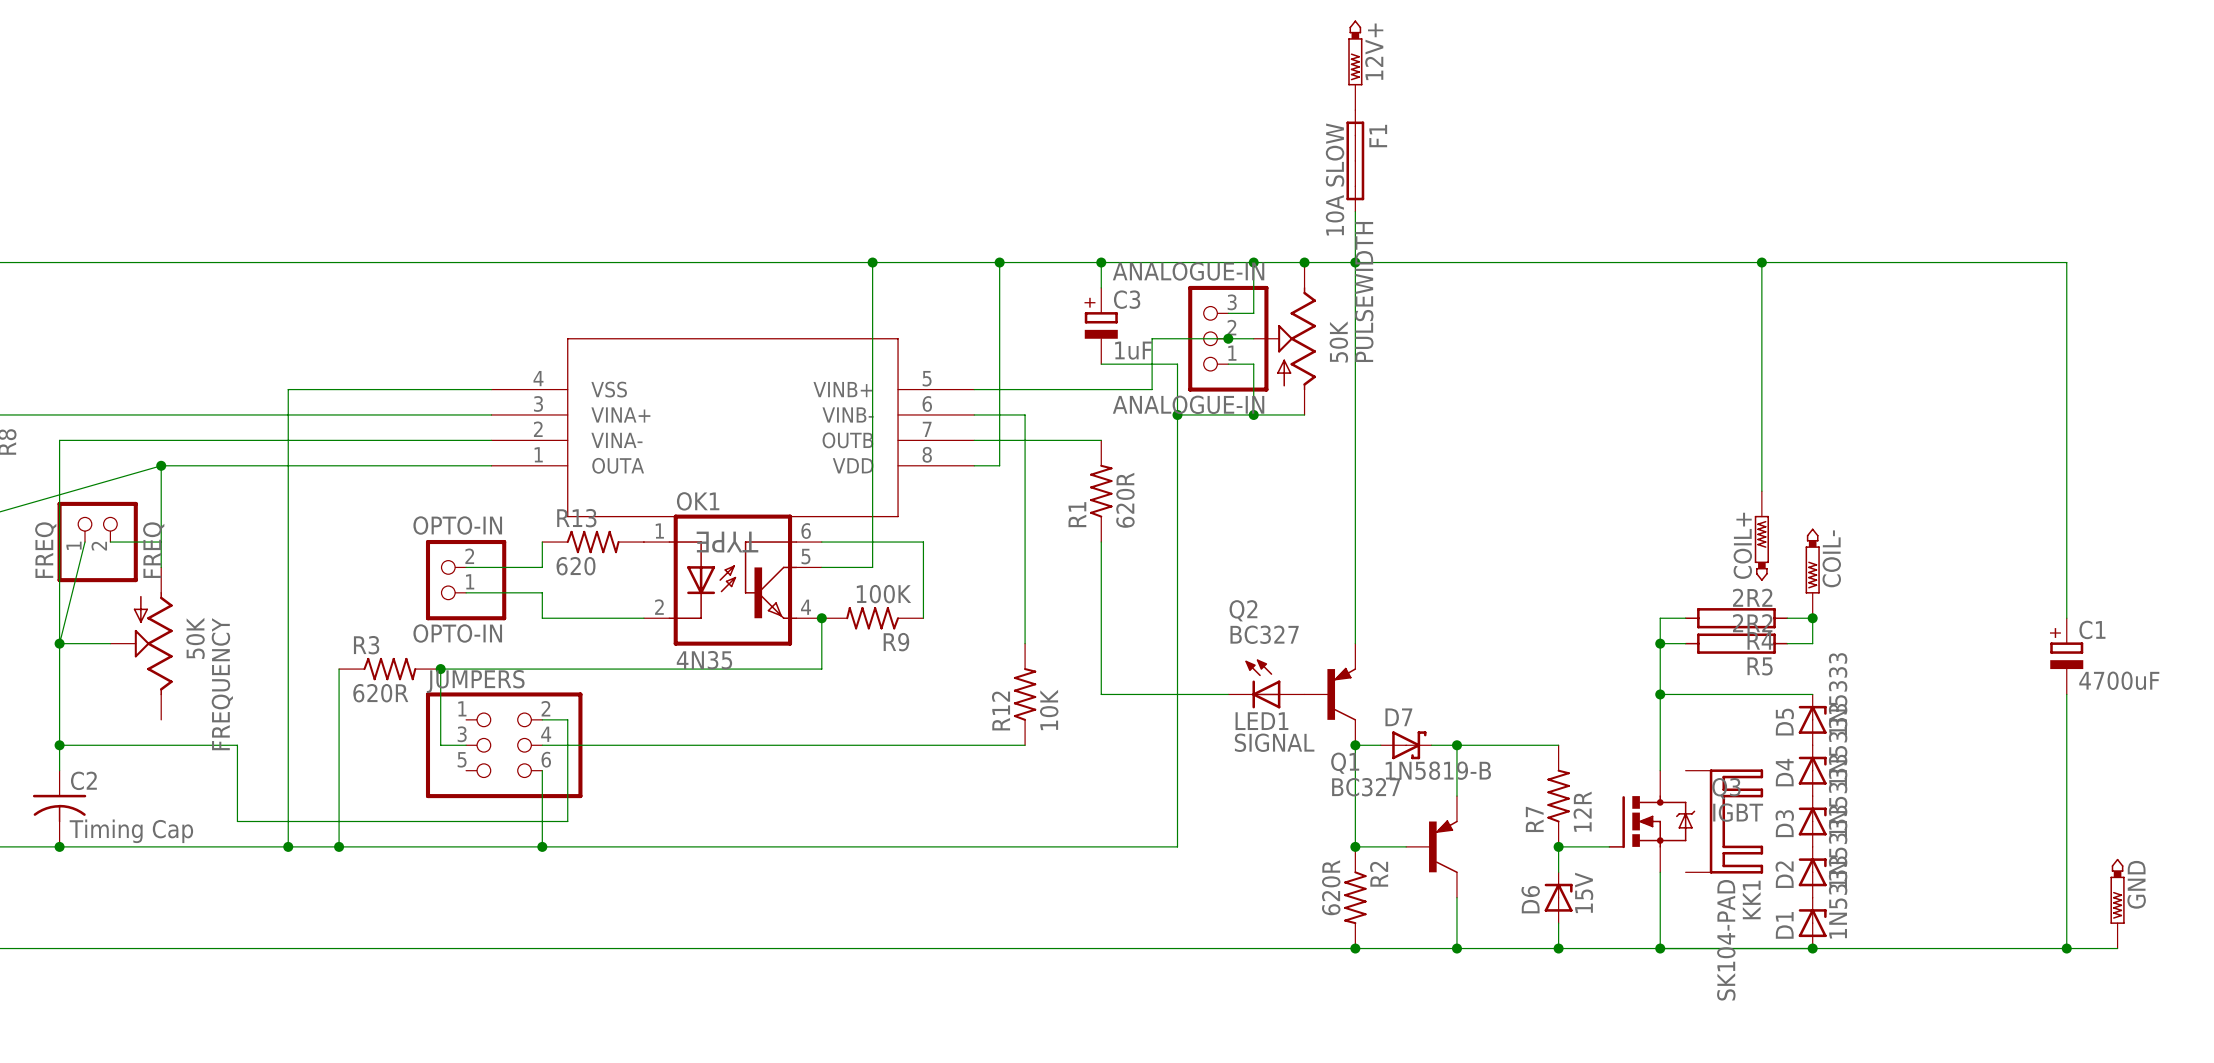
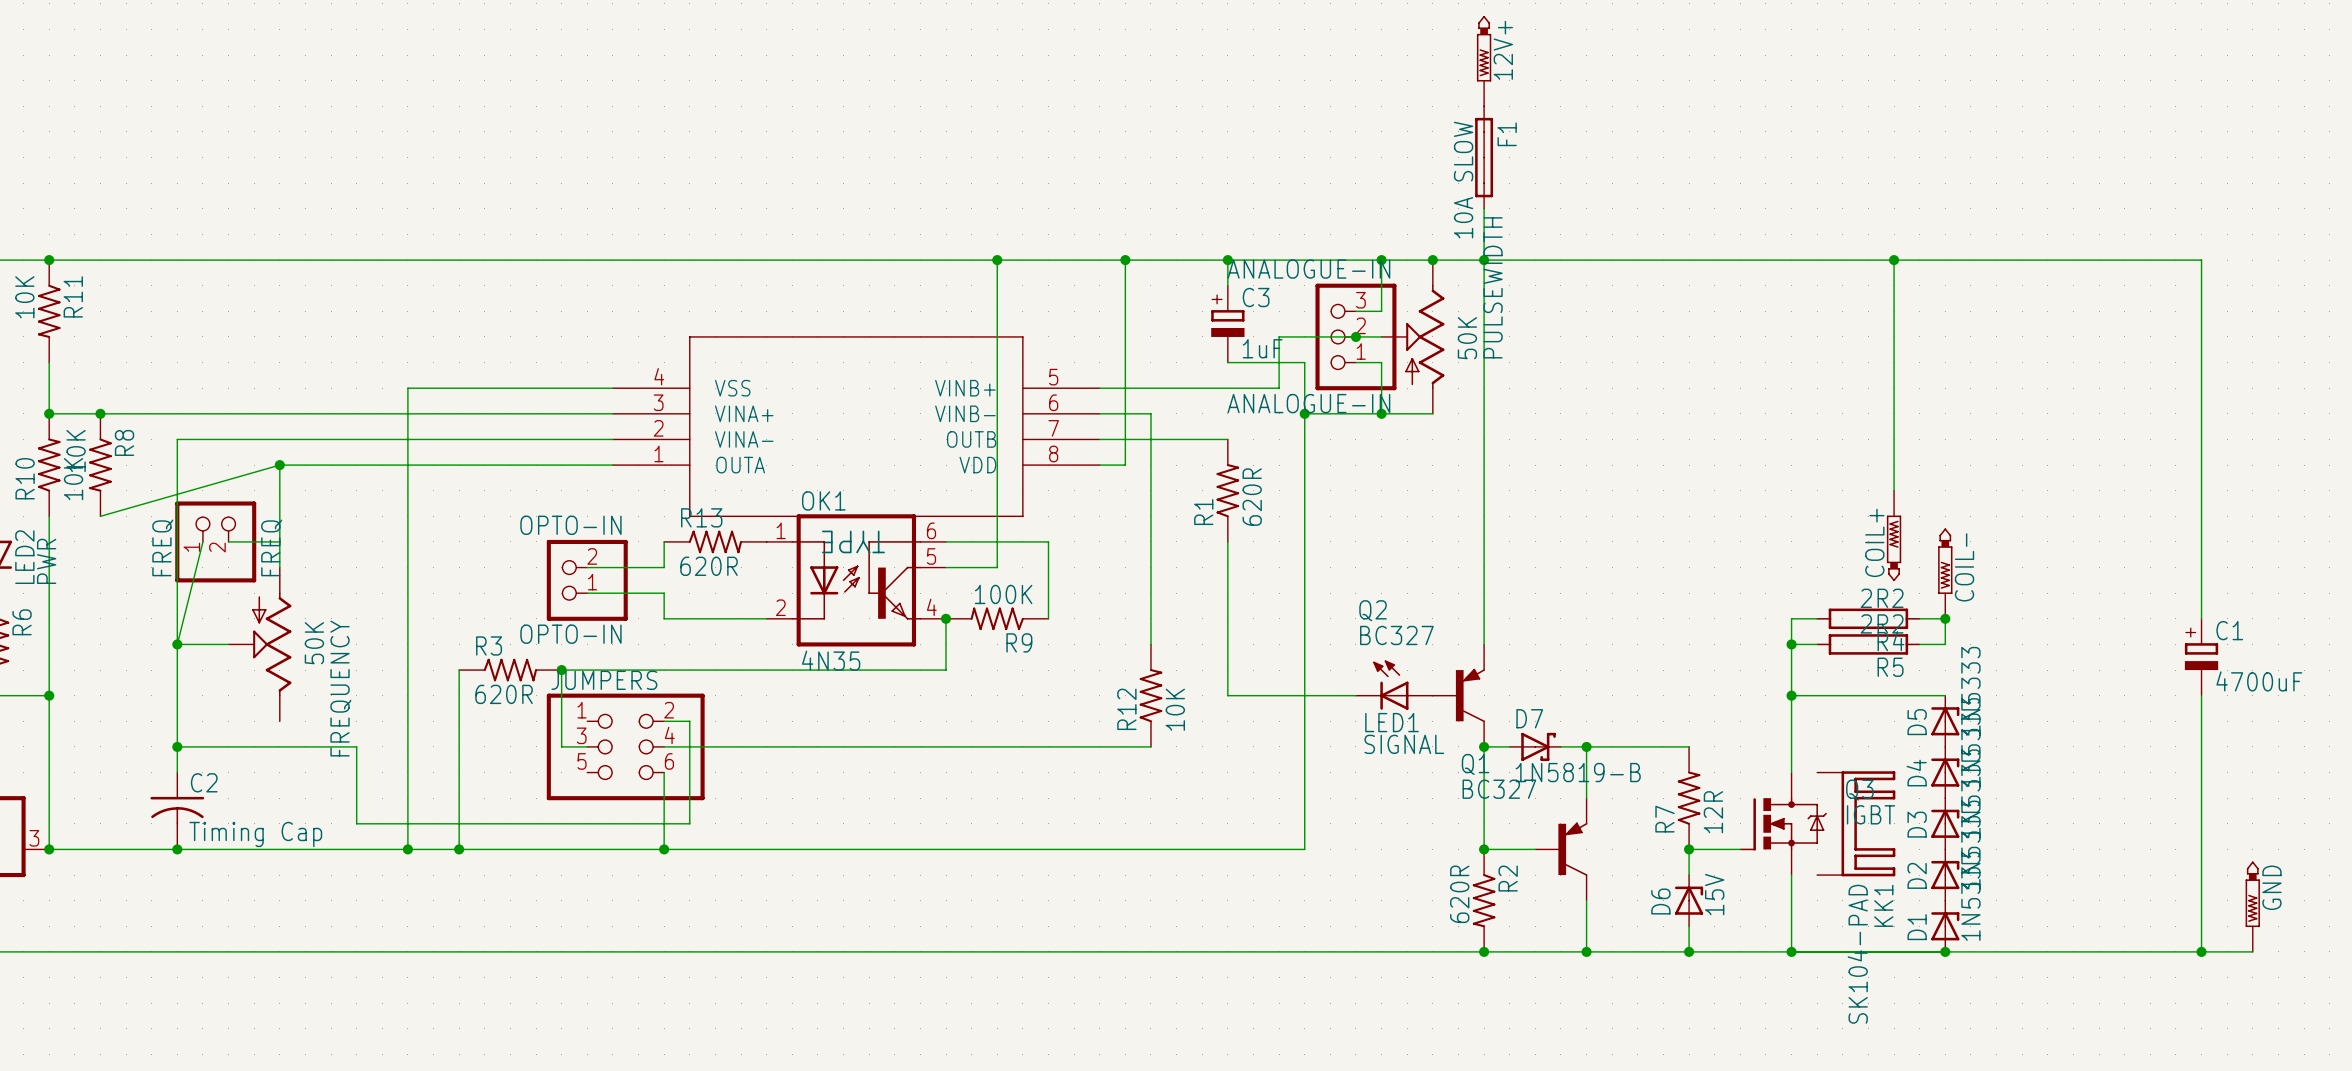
R13 value: 620 (576, 566) -> 620R (709, 566)

